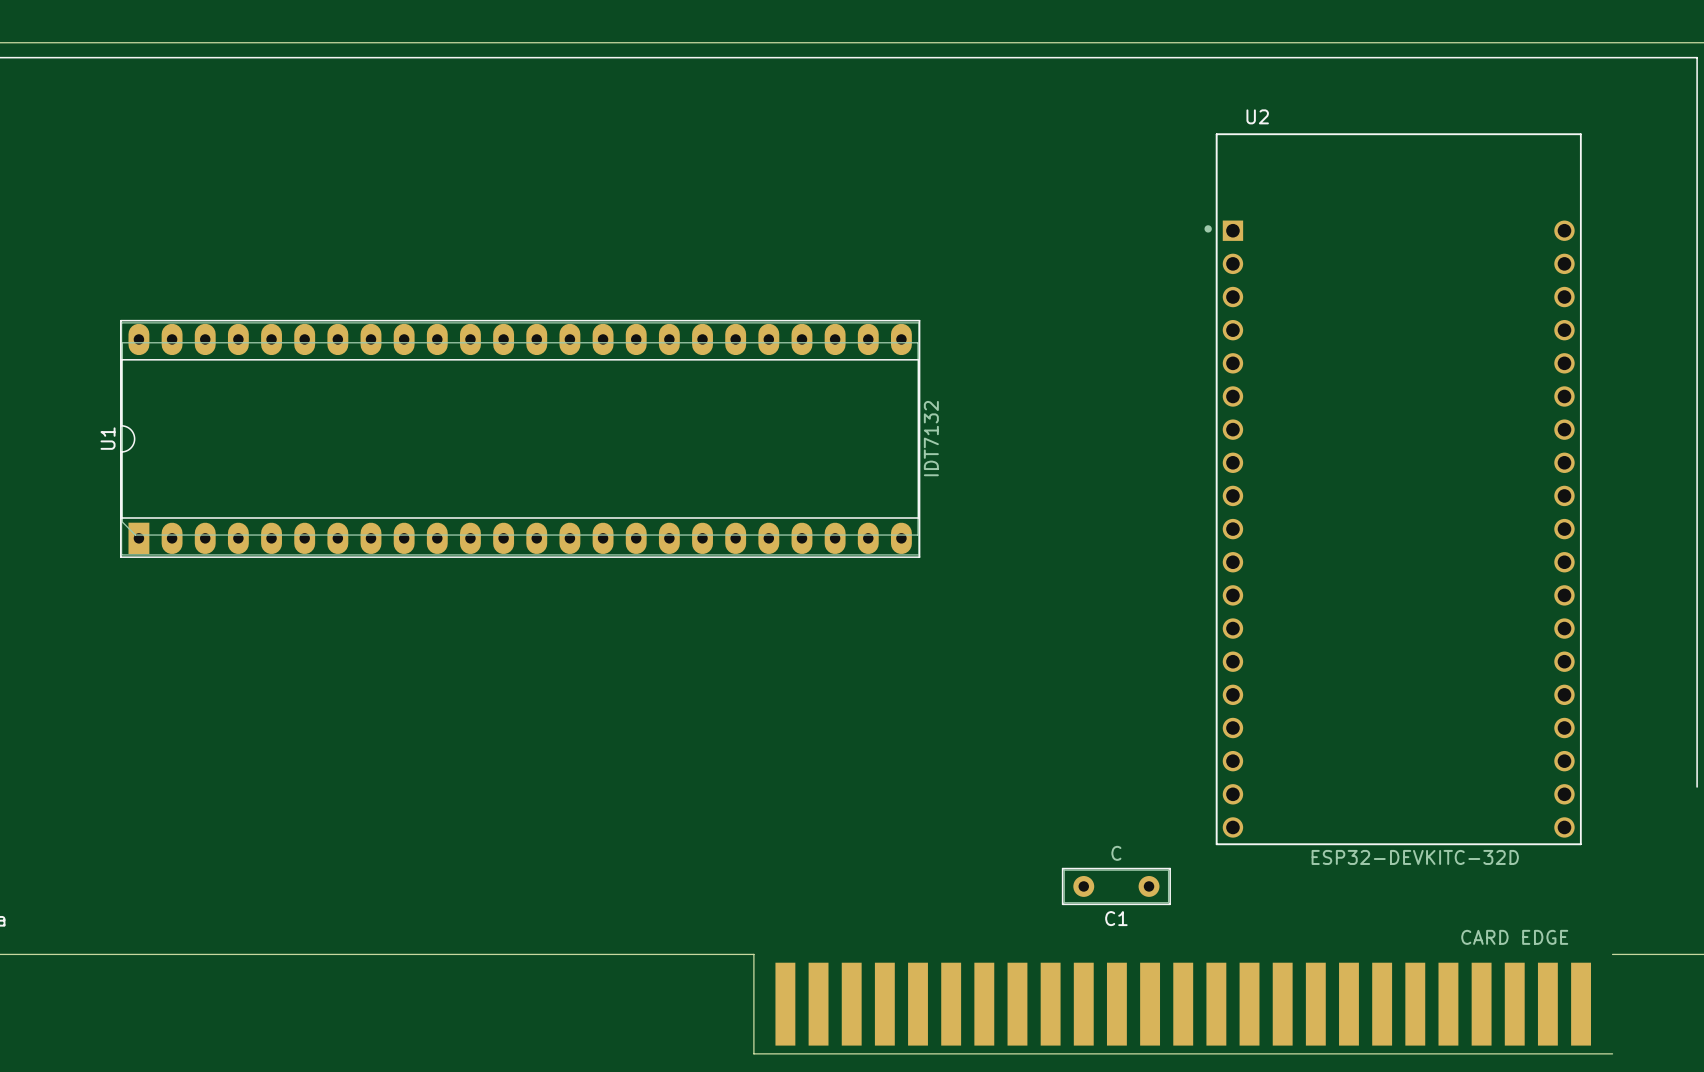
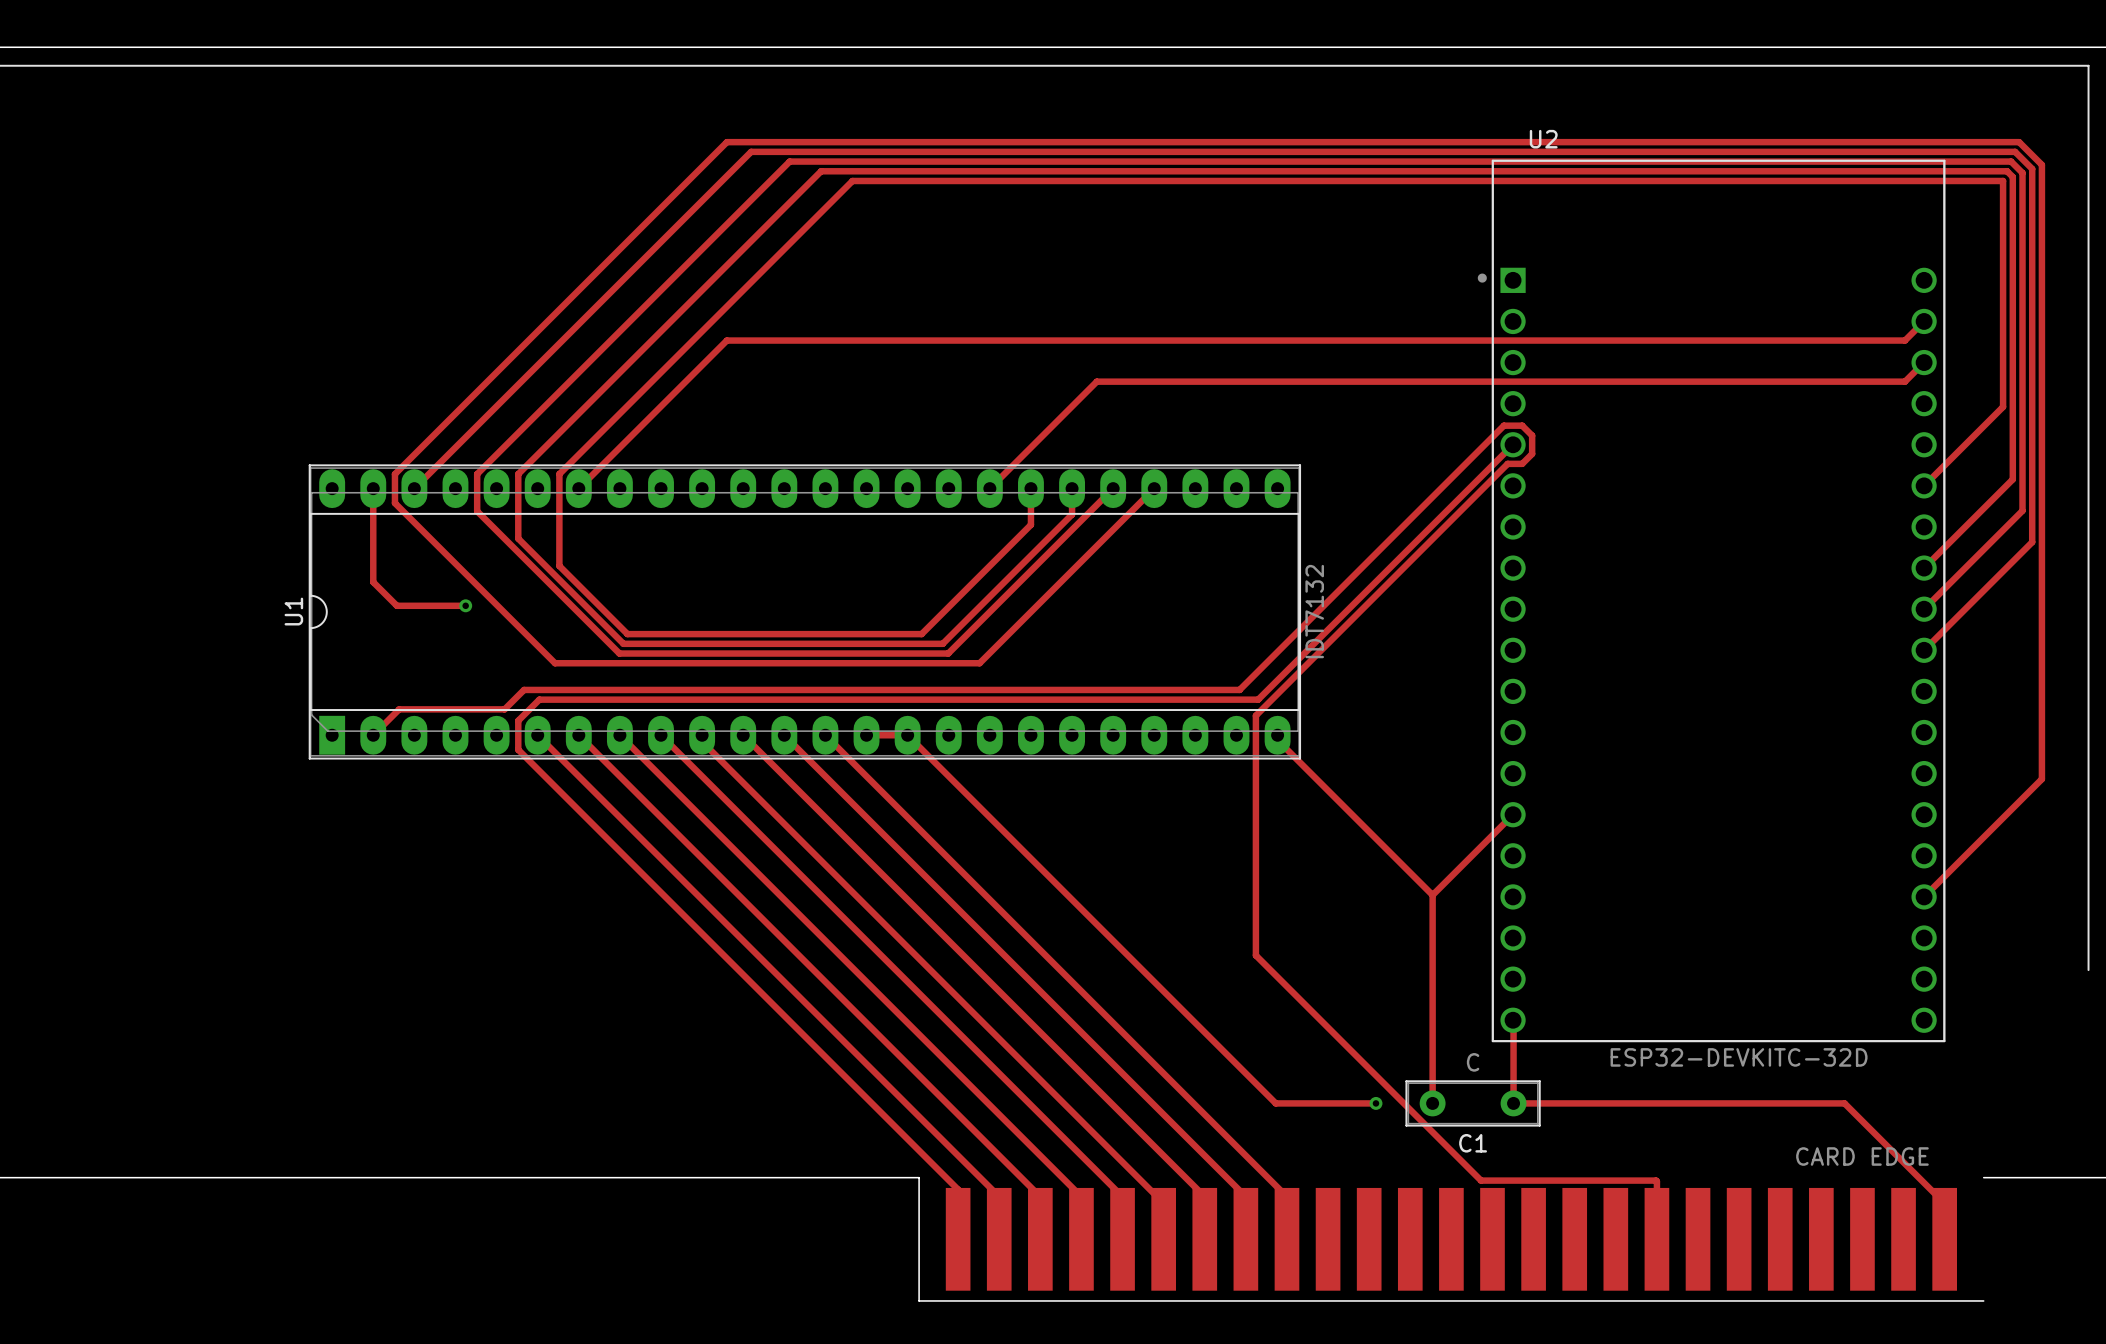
track: none -> (1924, 321) (1905, 340) (726, 340) (578, 488)
track: none -> (1924, 362) (1905, 381) (1096, 381) (989, 488)
track: none -> (1513, 444) (1258, 699) (539, 699) (518, 720) (518, 749) (958, 1189) (958, 1239)
track: none -> (1924, 485) (2003, 406) (2003, 180) (852, 180) (559, 474) (559, 565) (627, 634) (921, 634) (1030, 524) (1030, 488)
track: none -> (373, 488) (373, 582) (396, 605) (465, 605)
track: none -> (414, 488) (751, 151) (2015, 151) (2032, 168) (2032, 542) (1924, 650)
track: none -> (1072, 488) (1072, 514) (942, 643) (623, 643) (518, 538) (518, 474) (821, 171) (2007, 171) (2012, 176) (2012, 479) (1924, 568)
track: none -> (1113, 488) (948, 653) (619, 653) (477, 511) (477, 474) (789, 161) (2011, 161) (2022, 172) (2022, 510) (1924, 609)
track: none -> (1154, 488) (979, 663) (555, 663) (394, 503) (394, 474) (726, 142) (2019, 142) (2041, 164) (2041, 779) (1924, 896)
U1 position: (520, 438) -> (804, 611)
via: none -> (465, 605)
track: none -> (373, 735) (399, 709) (504, 709) (524, 689) (1239, 689) (1503, 425) (1522, 425) (1532, 435) (1532, 453) (1522, 463) (1507, 463) (1255, 715) (1255, 955) (1481, 1180) (1656, 1180) (1656, 1239)
track: none -> (537, 735) (999, 1196) (999, 1239)
track: none -> (578, 735) (1040, 1196) (1040, 1239)
track: none -> (619, 735) (1081, 1196) (1081, 1239)
track: none -> (661, 735) (1122, 1196) (1122, 1239)
track: none -> (702, 735) (702, 741) (1163, 1203) (1163, 1239)
track: none -> (743, 735) (1204, 1196) (1204, 1239)
track: none -> (784, 735) (1245, 1196) (1245, 1239)
track: none -> (825, 735) (1286, 1196) (1286, 1239)
track: none -> (866, 735) (907, 735) (1275, 1103) (1375, 1103)
track: none -> (1277, 735) (1277, 740) (1432, 895)
track: none -> (1513, 814) (1432, 895)
track: none -> (1432, 895) (1432, 1103)
track: none -> (1513, 1020) (1513, 1103) (1844, 1103) (1944, 1203) (1944, 1239)
C1 position: (1116, 886) -> (1473, 1103)
via: none -> (1375, 1103)

